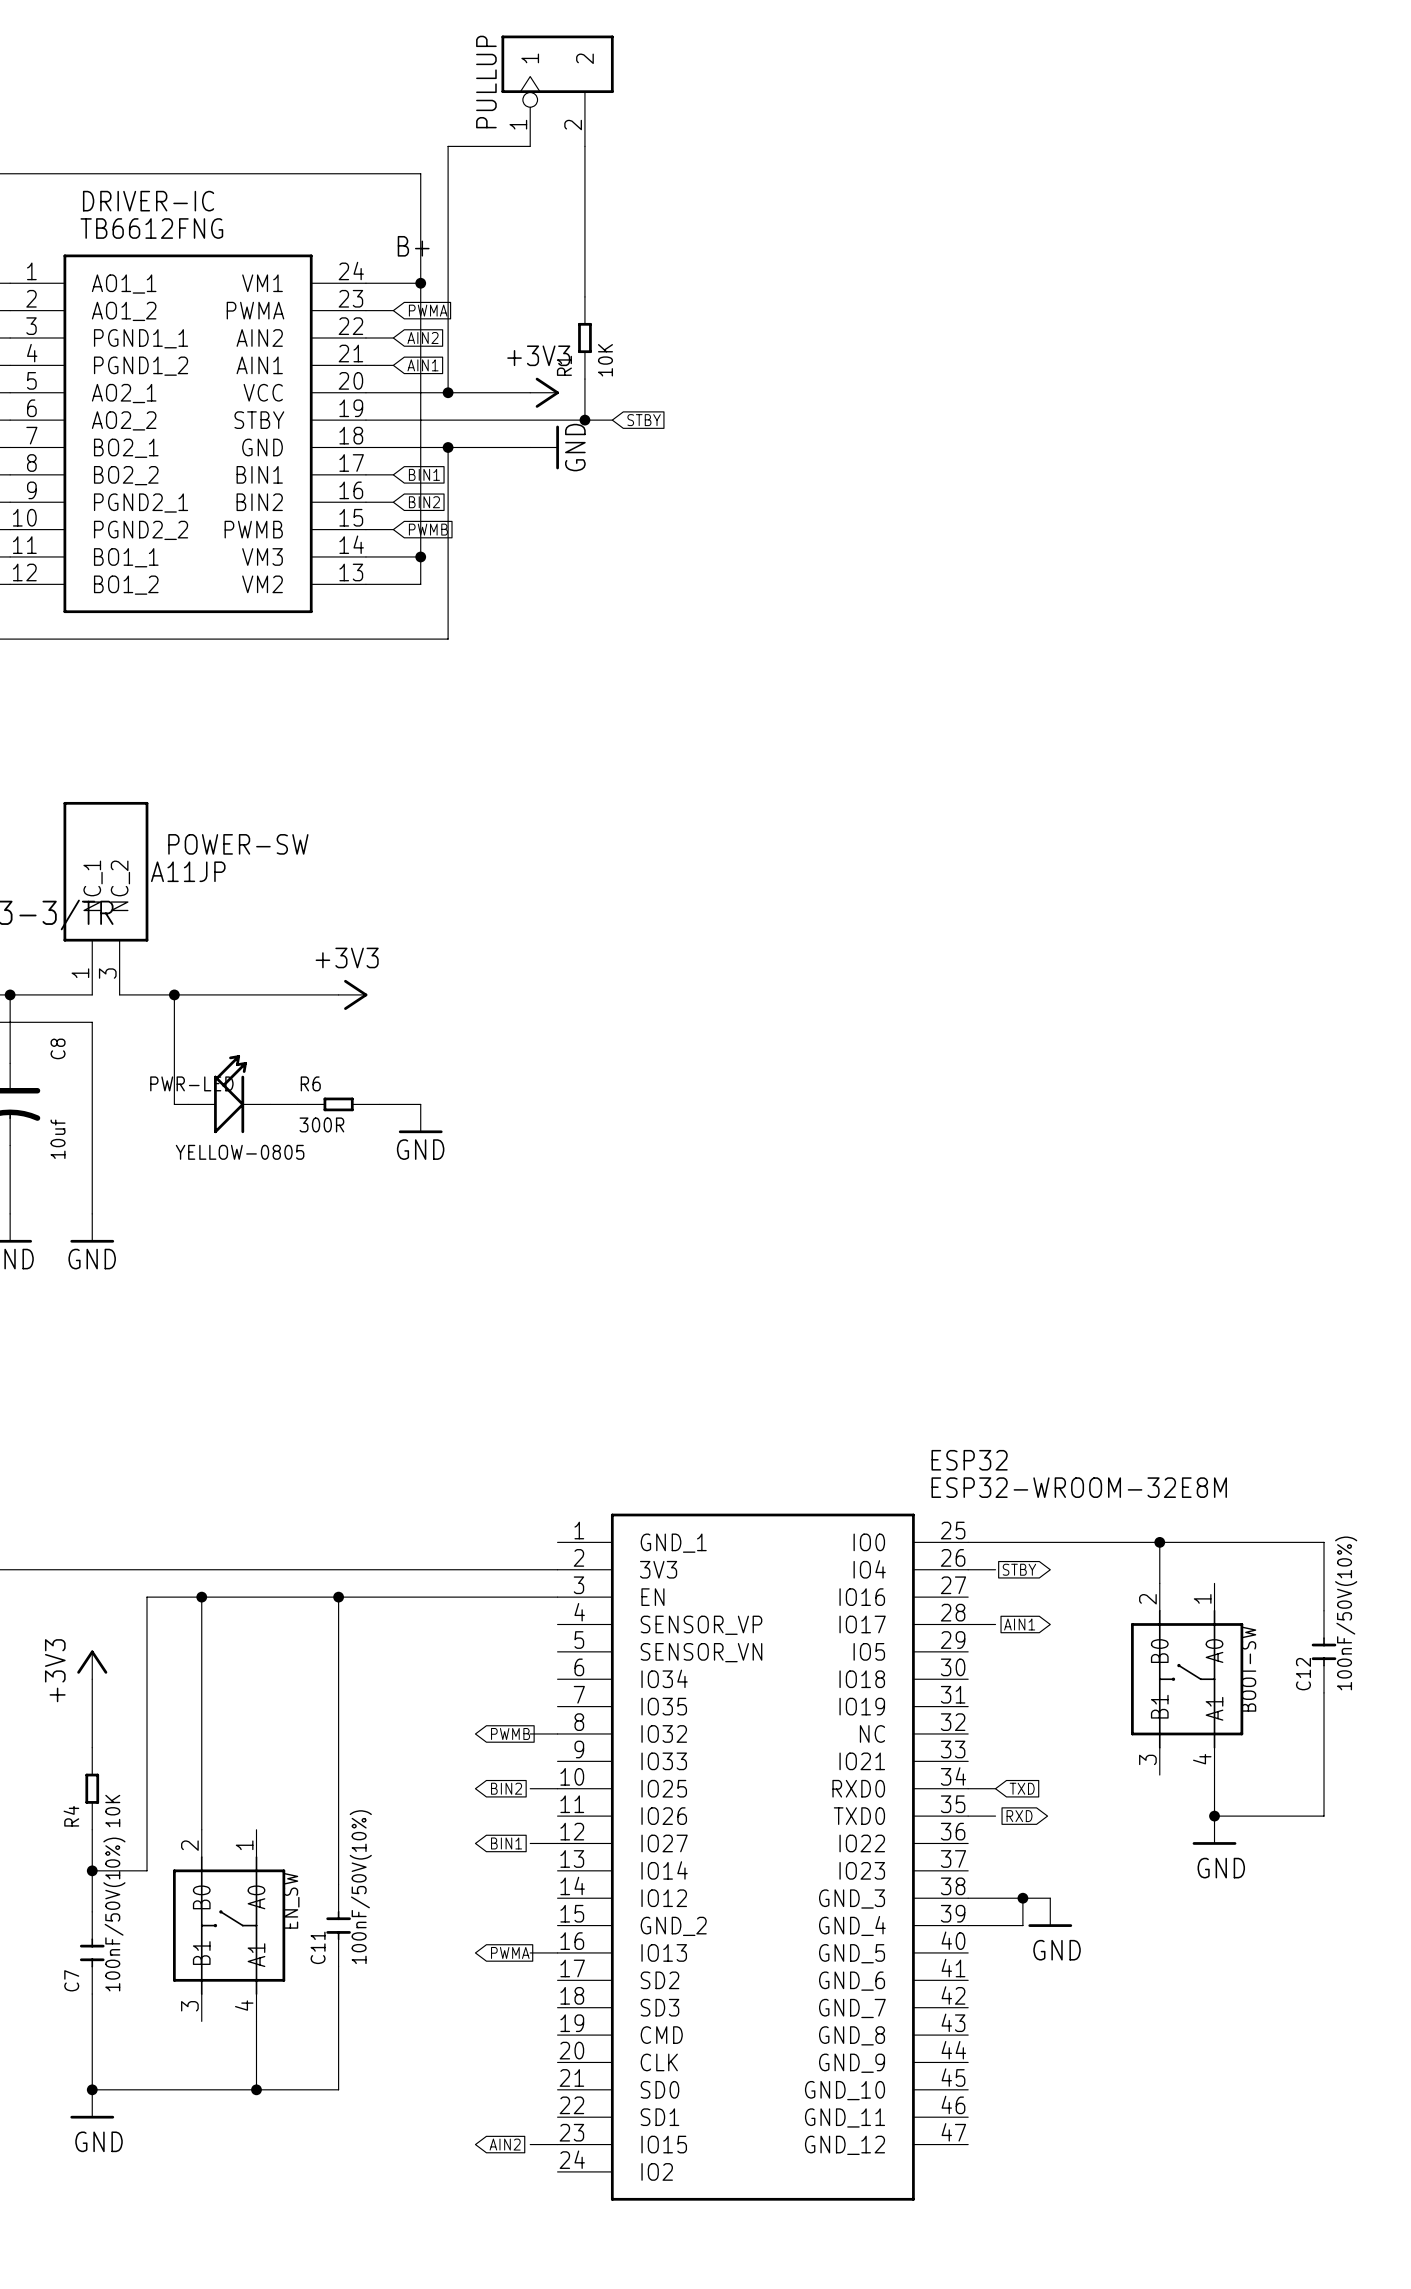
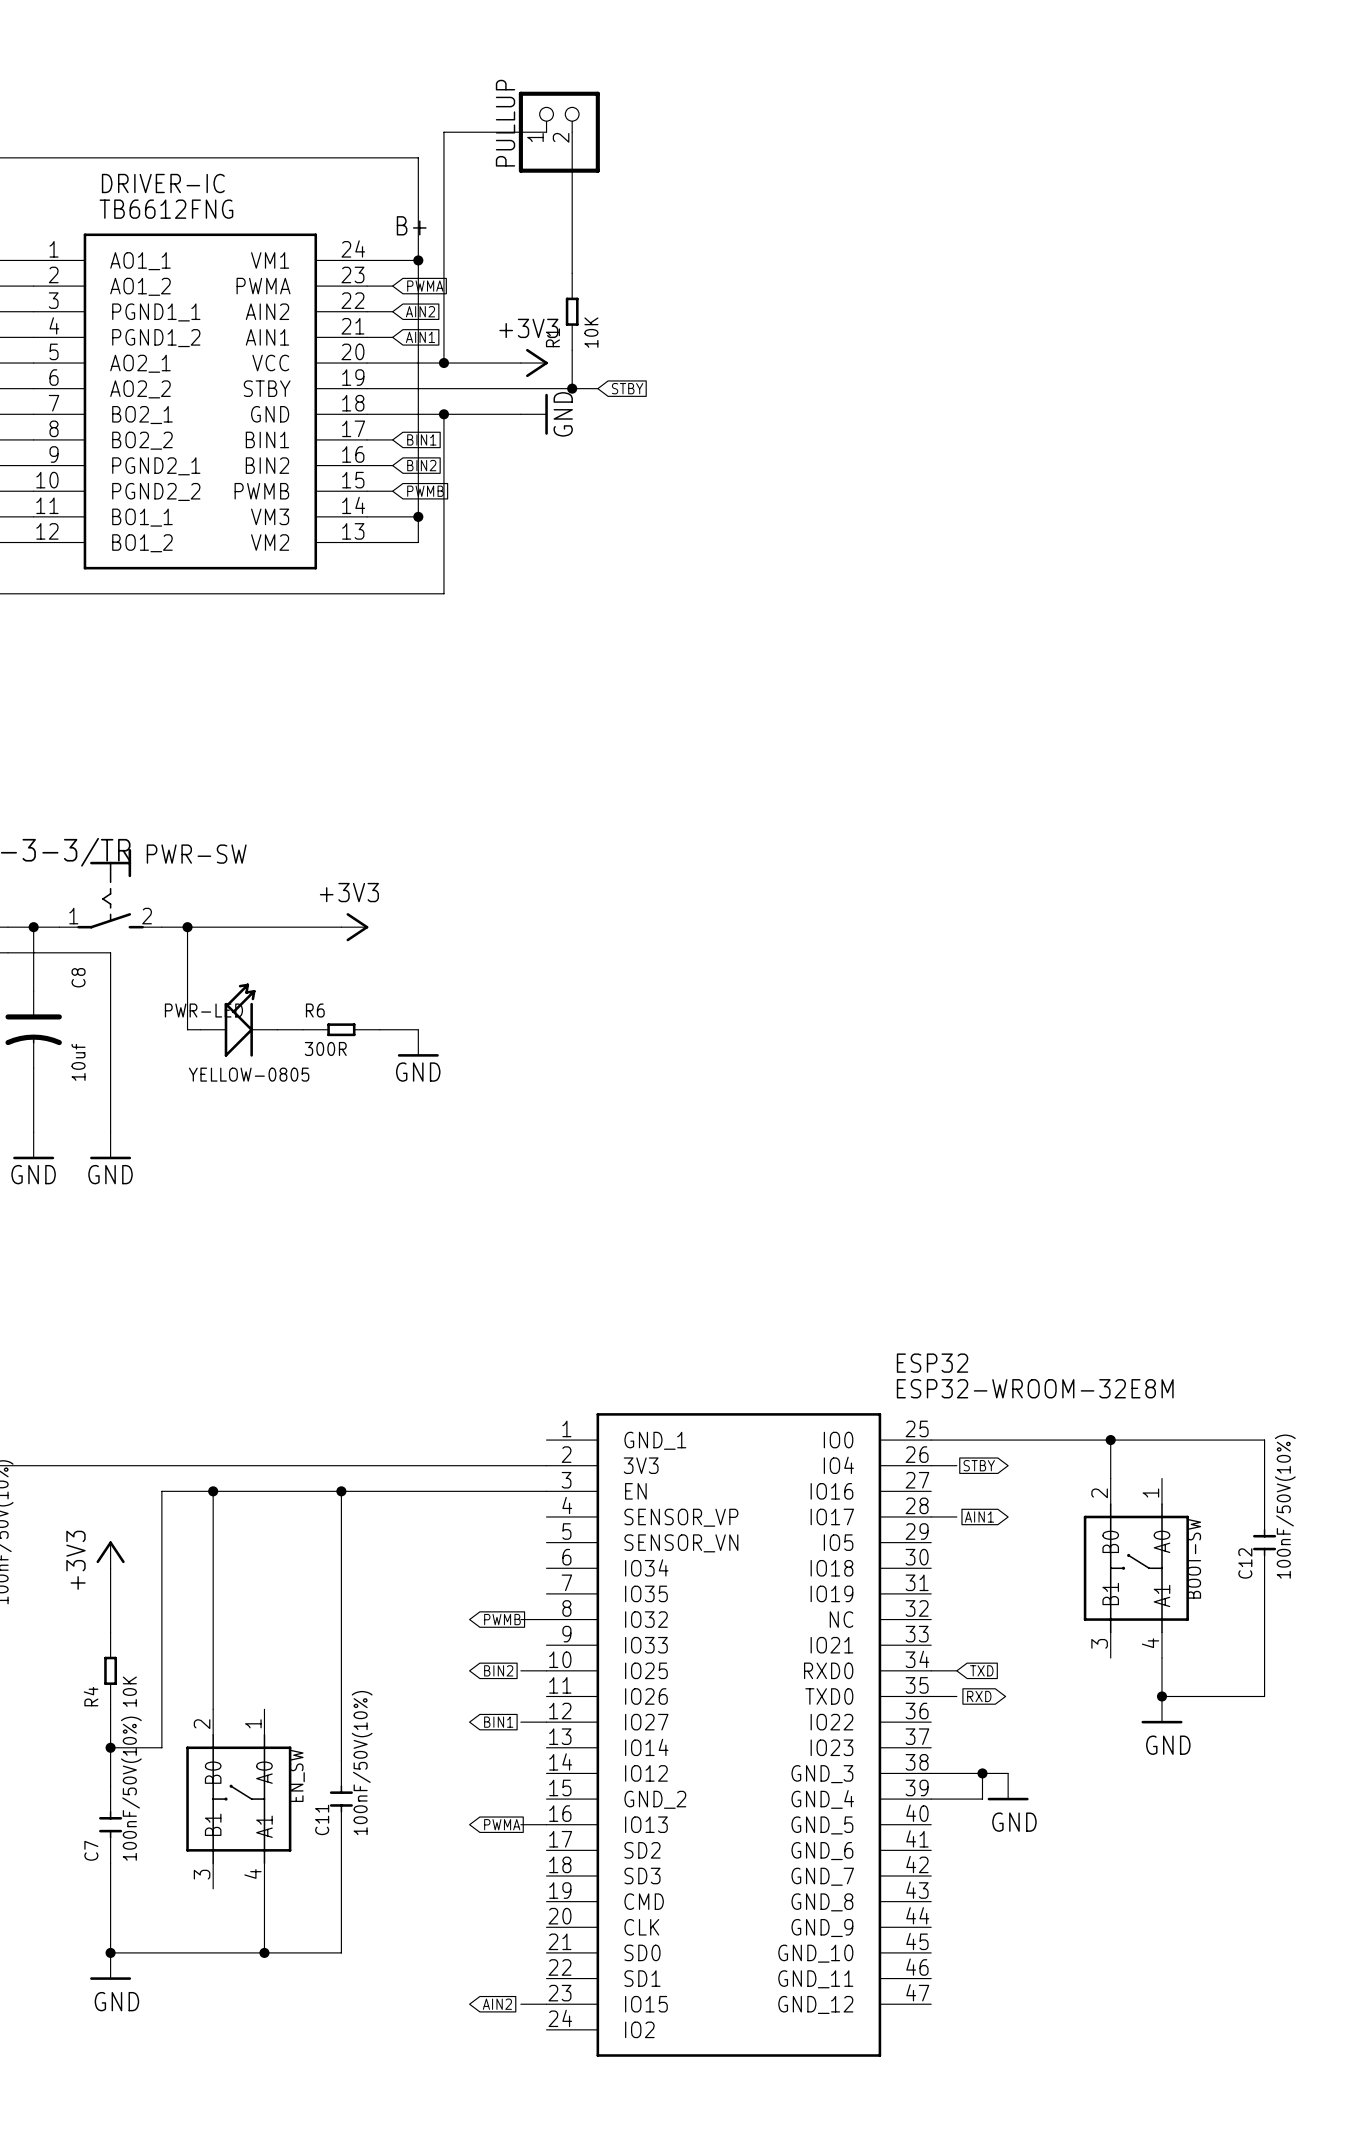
PULLUP: (557, 90) -> none
wire: none -> (520, 132) (546, 132)
PULLUP: none -> (559, 132)
POWER-SW: A11JP (105, 898) -> none
PWR-SW: none -> (110, 888)

